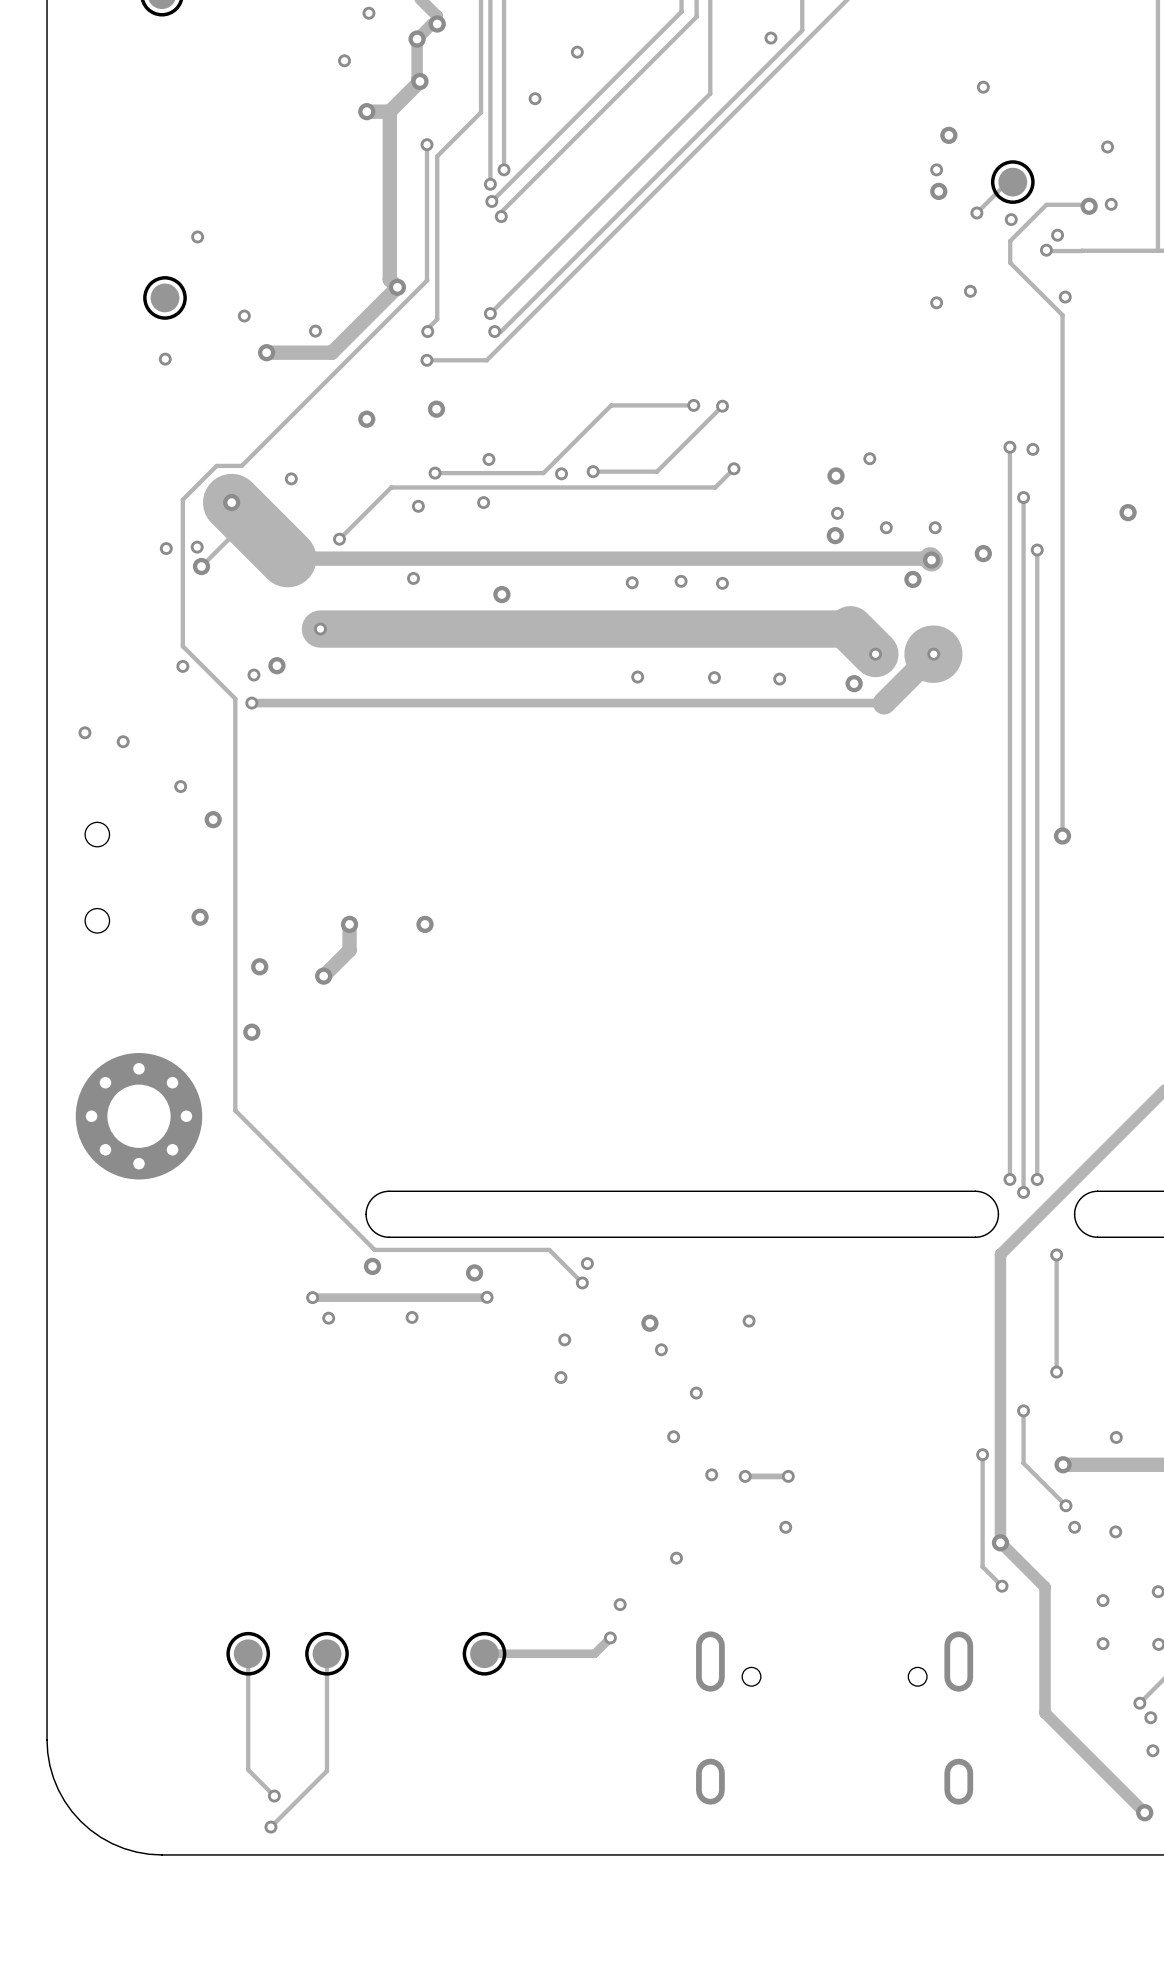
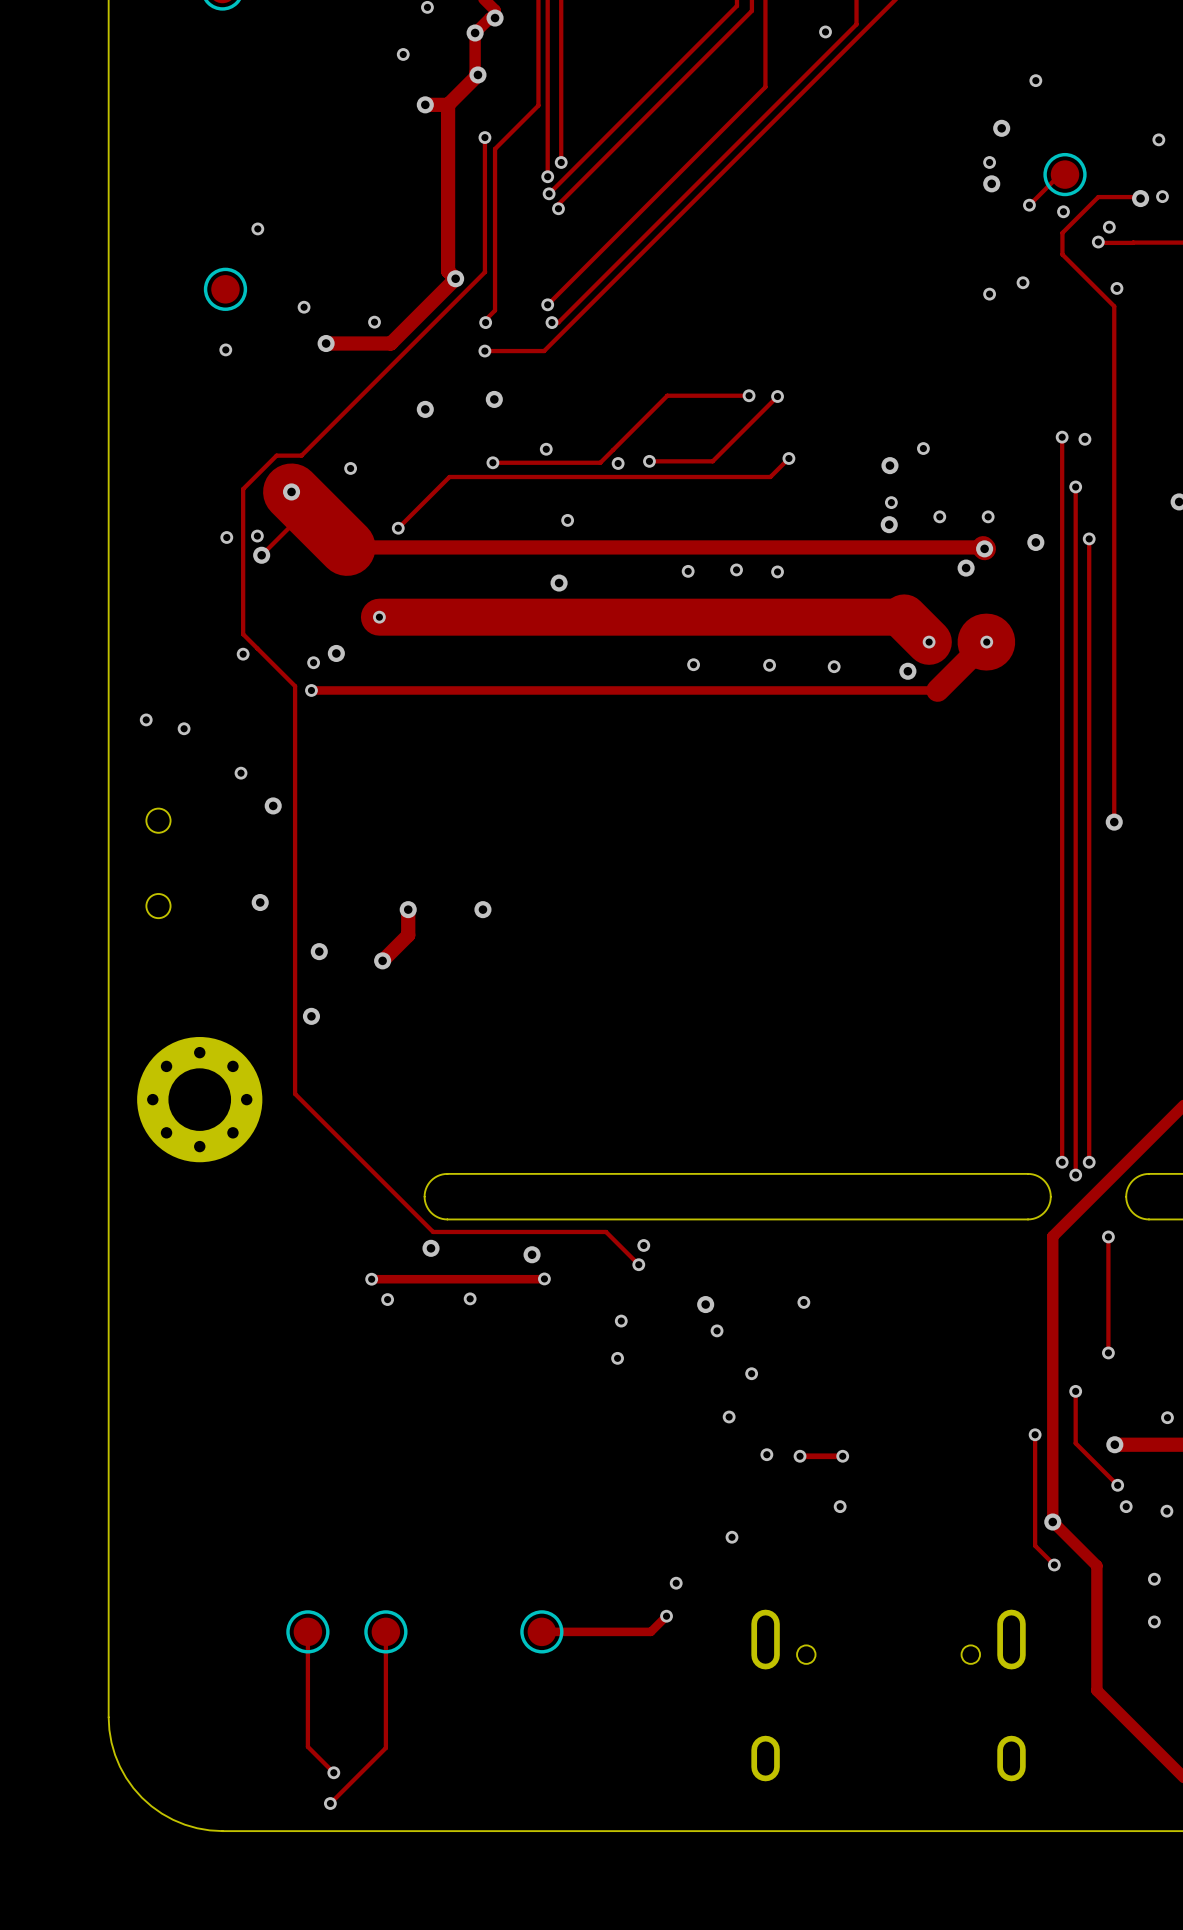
via: (577, 52) -> none
via: (535, 98) -> none
via position: (483, 502) -> (567, 520)
via: (418, 506) -> none
via: (413, 578) -> none

